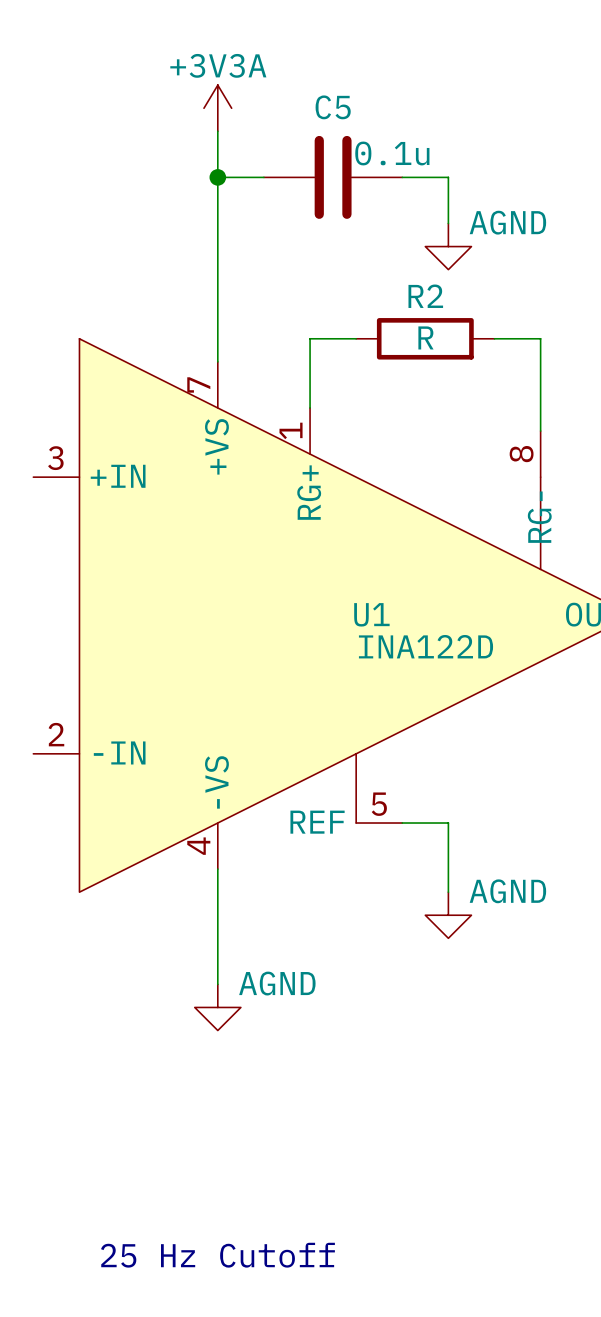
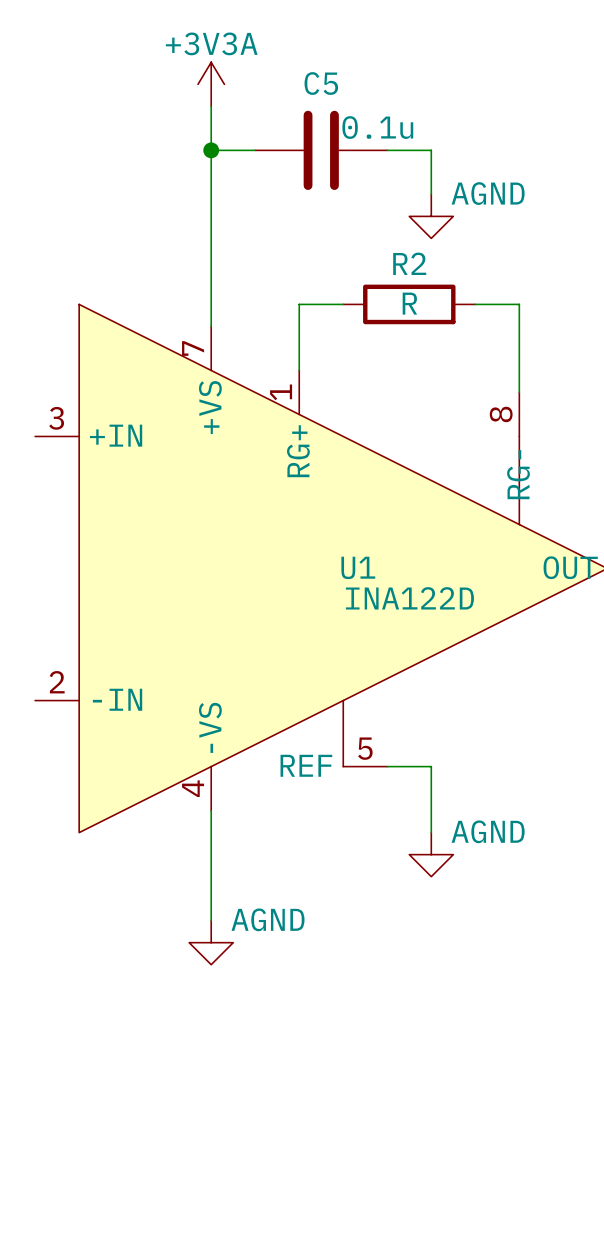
text: 25 Hz Cutoff (217, 1255) -> none

